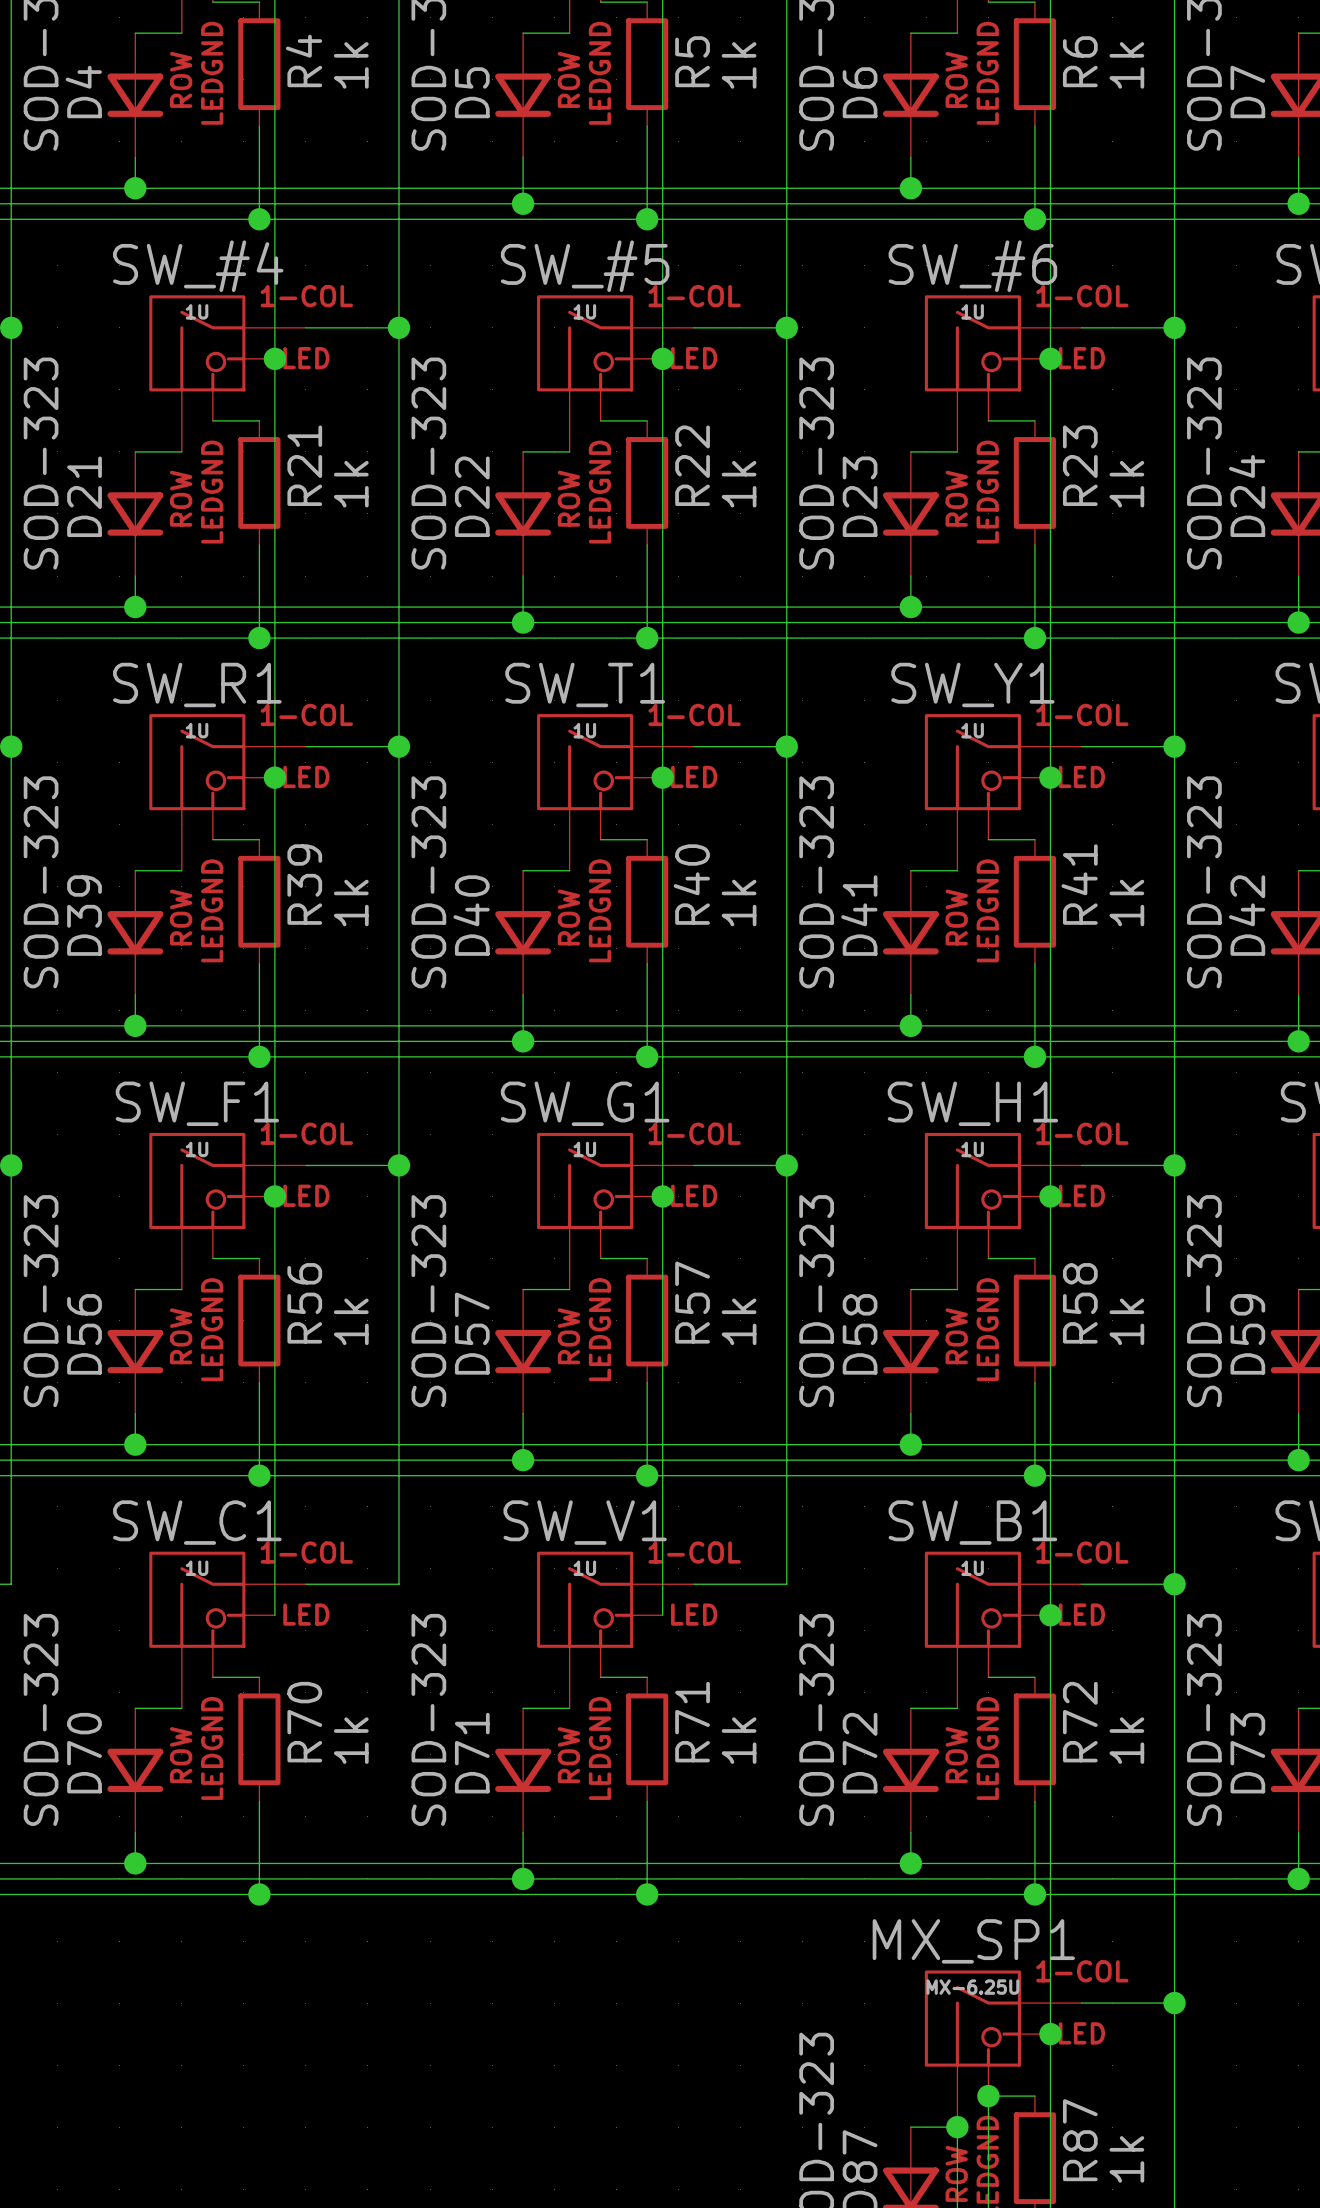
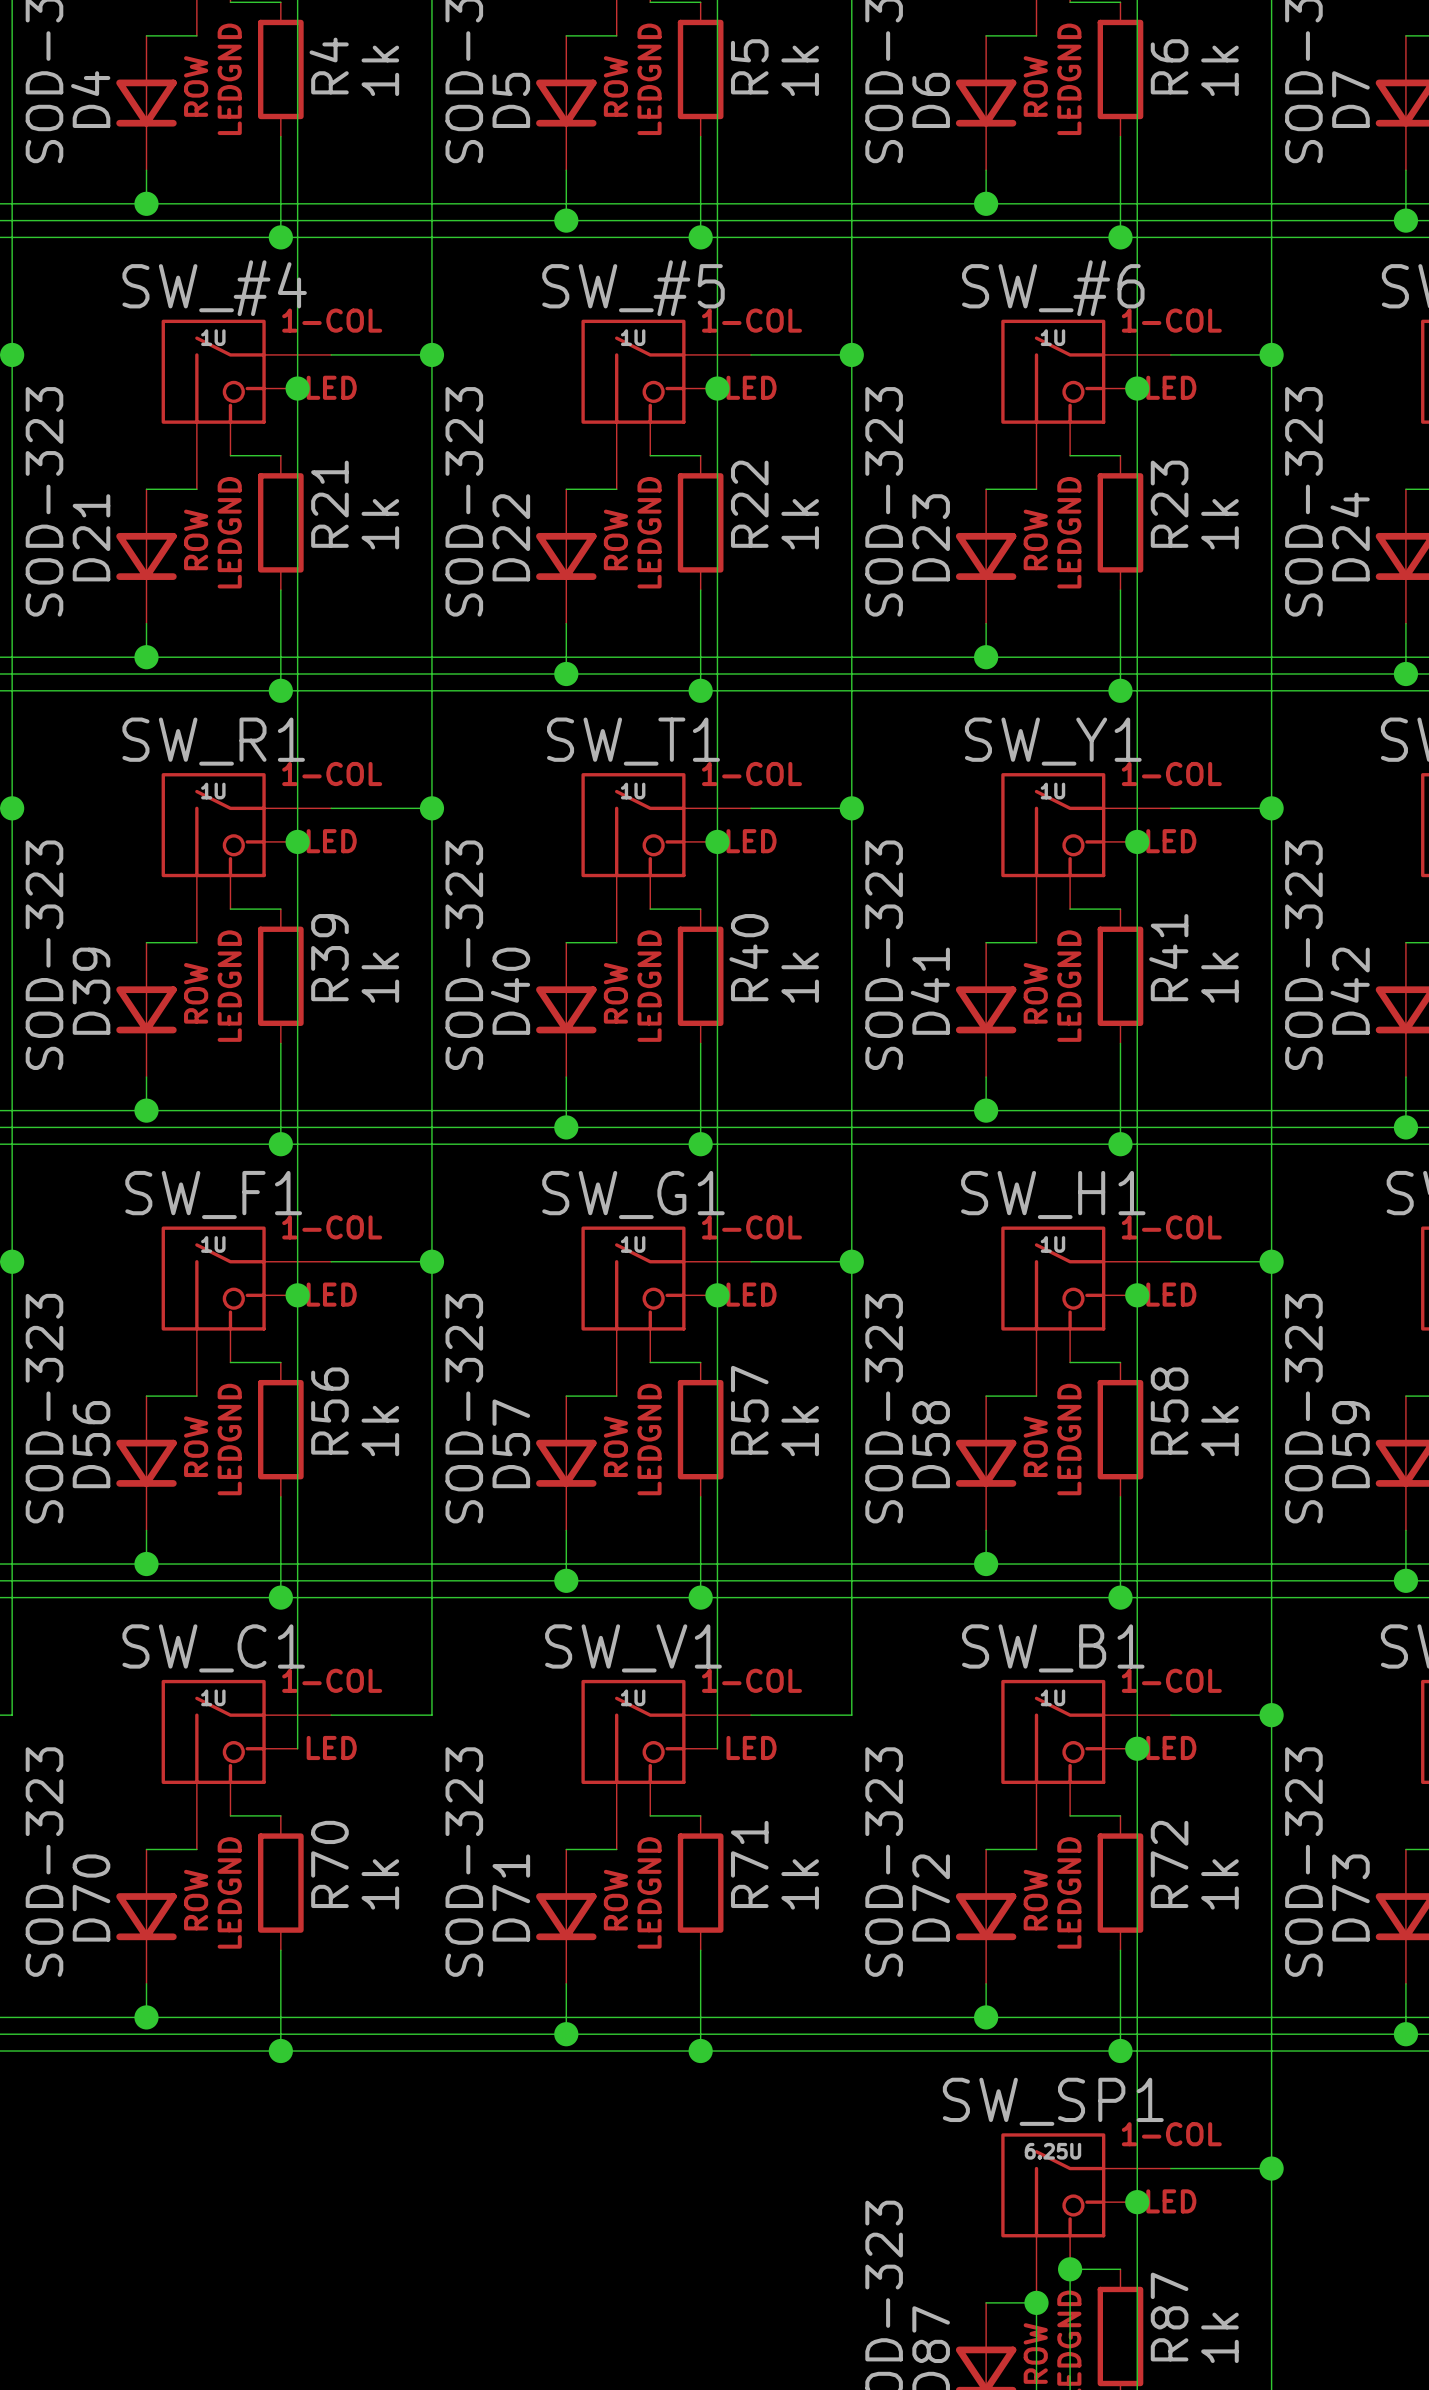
MX_SP1 name: MX_SP1 (973, 1941) -> SW_SP1 (1053, 2101)
MX_SP1 value: MX-6.25U (972, 1987) -> 6.25U (1052, 2151)

